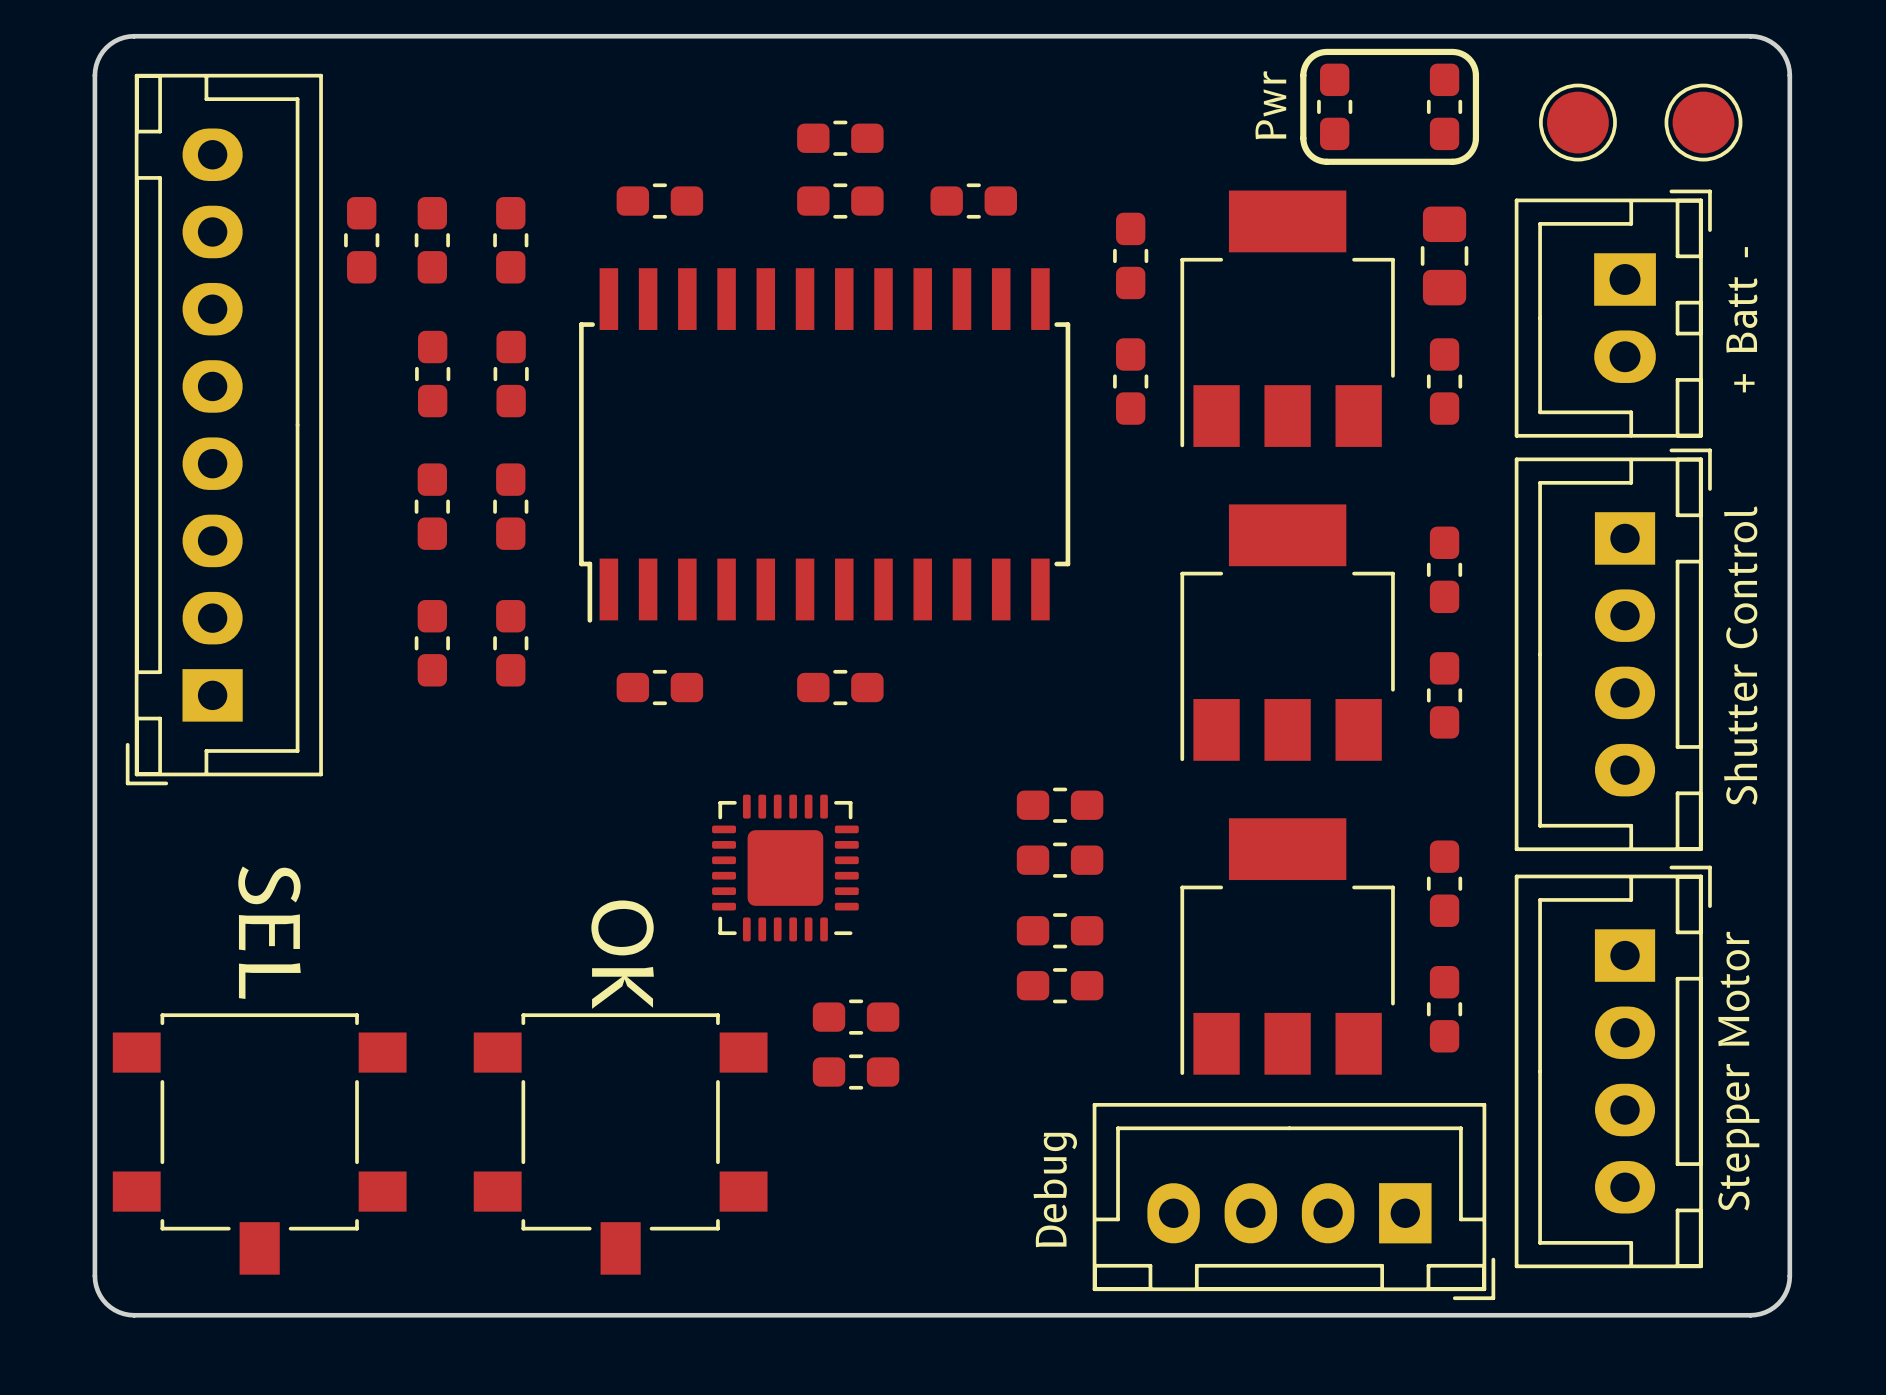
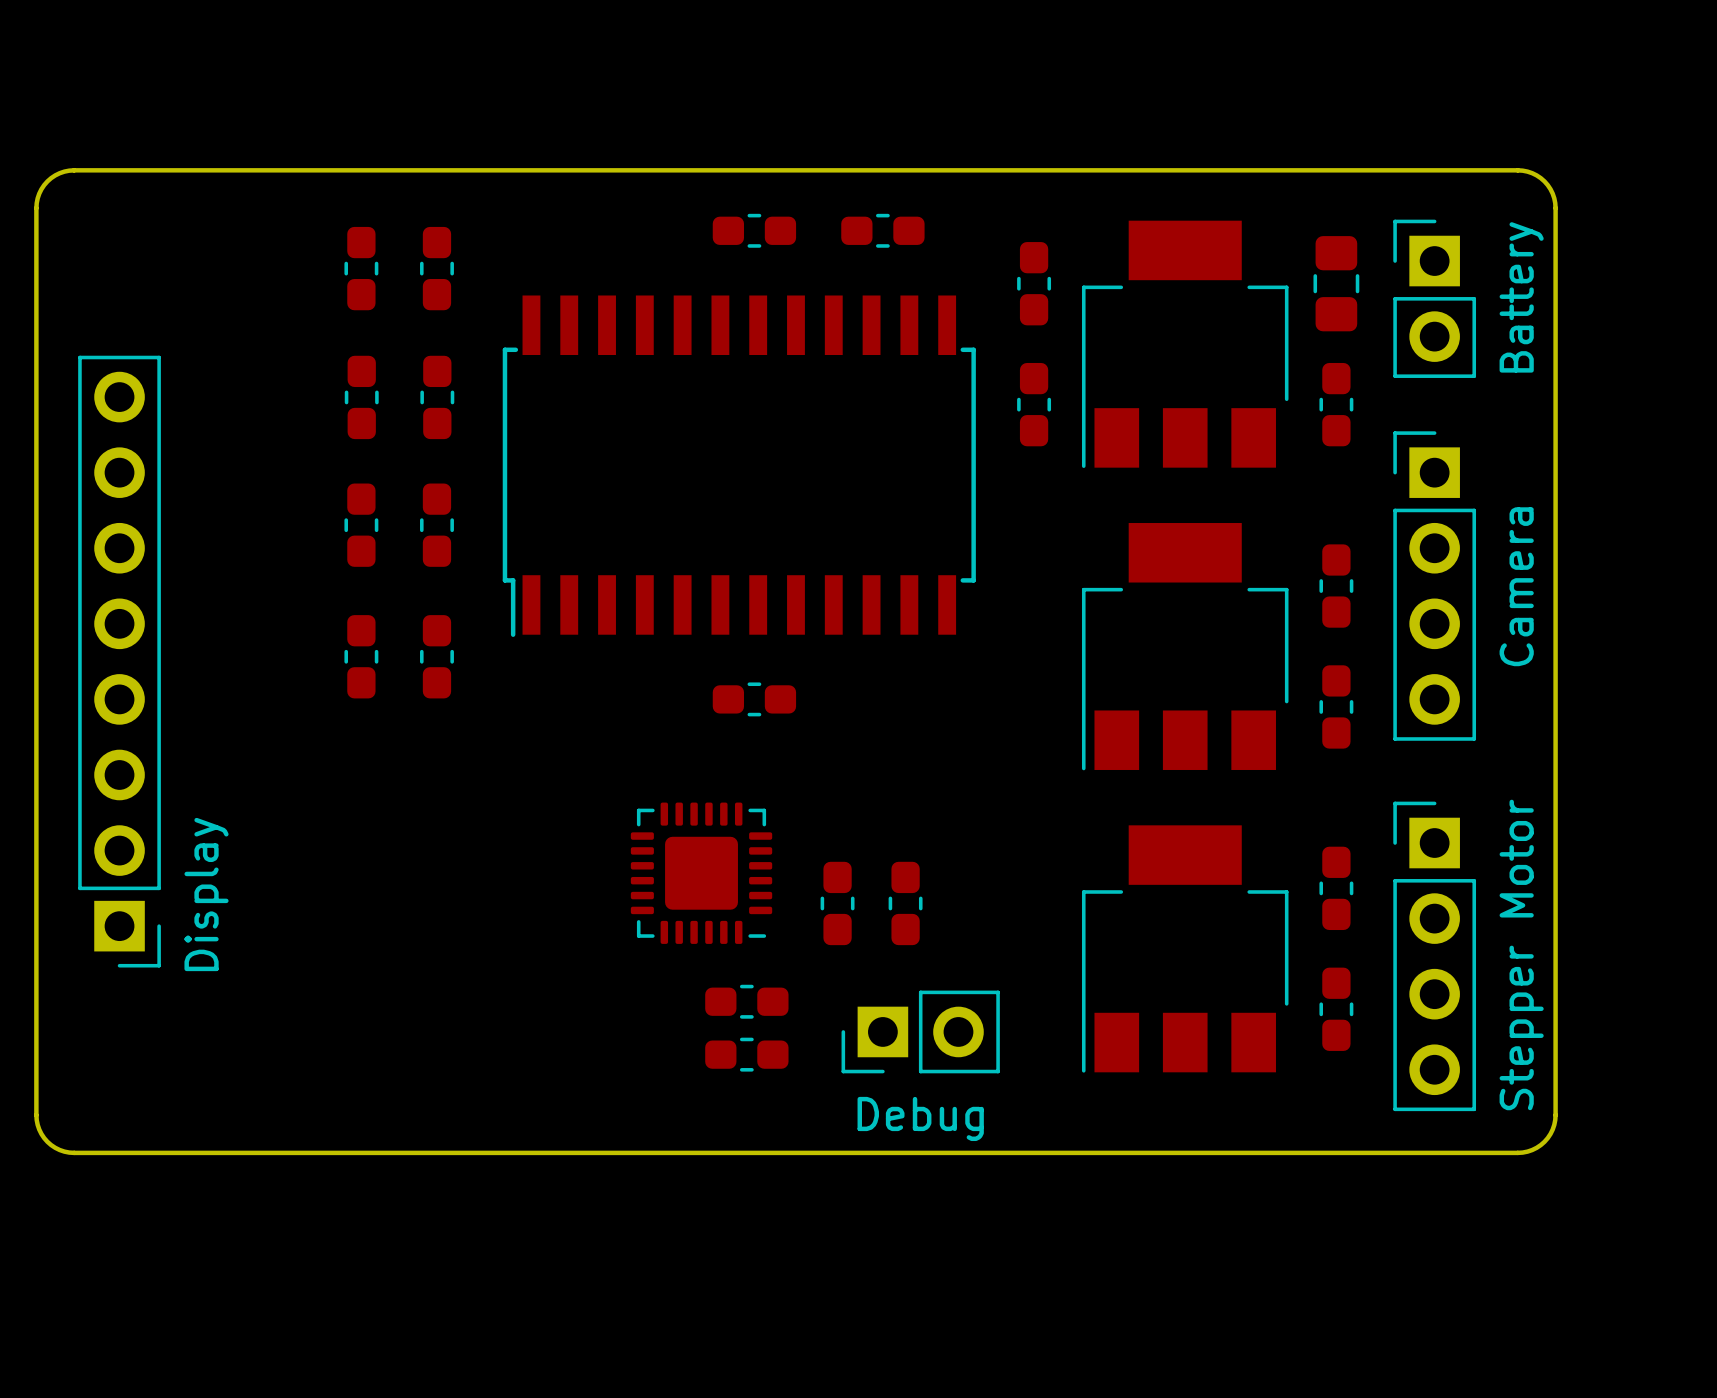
line: (1326, 51) (1452, 51) (1466, 56) (1474, 66) (1475, 75) (1475, 138) (1471, 152) (1464, 158) (1452, 161) (1326, 161) (1312, 156) (1306, 150) (1303, 141) (1303, 72) (1310, 58) (1317, 53) (1326, 51) -> none
text: Pwr (1270, 105) -> none
part: (1334, 106) -> none
part: (1444, 106) -> none
part: (1577, 122) -> none
part: (1703, 122) -> none
part: (840, 138) -> none
board edge: (94, 177) (96, 65) (100, 55) (110, 44) (129, 36) (1750, 36) (1770, 41) (1784, 55) (1789, 75) (1789, 1281) (1784, 1295) (1774, 1307) (1760, 1313) (1750, 1315) (129, 1314) (114, 1310) (106, 1303) (100, 1295) (95, 1281) (94, 1119) -> (36, 208) (39, 193) (47, 181) (59, 173) (74, 170) (1517, 170) (1532, 173) (1544, 181) (1552, 193) (1555, 208) (1555, 1115) (1550, 1134) (1536, 1147) (1517, 1152) (74, 1152) (59, 1150) (47, 1141) (39, 1129) (36, 1115)
part: (659, 201) -> none
part: (361, 240) -> none
Battery: none -> (1434, 298)
part: (1613, 313) -> none
text: + Batt - (1741, 319) -> none
part: (224, 429) -> none
Camera: none -> (1434, 586)
Display: none -> (119, 661)
part: (1613, 649) -> none
text: Shutter Control (1740, 655) -> none
part: (659, 687) -> none
part: (1060, 805) -> none
part: (1060, 860) -> none
part: none -> (837, 903)
part: none -> (905, 903)
part: (1060, 930) -> none
text: SEL (269, 932) -> none
text: OK (622, 954) -> none
Stepper Motor: none -> (1434, 956)
part: (1060, 985) -> none
part: none -> (746, 1001)
part: (856, 1017) -> none
Debug: none -> (920, 1031)
part: none -> (746, 1054)
part: (1613, 1066) -> none
text: Stepper Motor (1738, 1071) -> none
part: (856, 1072) -> none
part: (259, 1144) -> none
part: (620, 1144) -> none
text: Debug (1055, 1190) -> none
part: (1293, 1201) -> none

